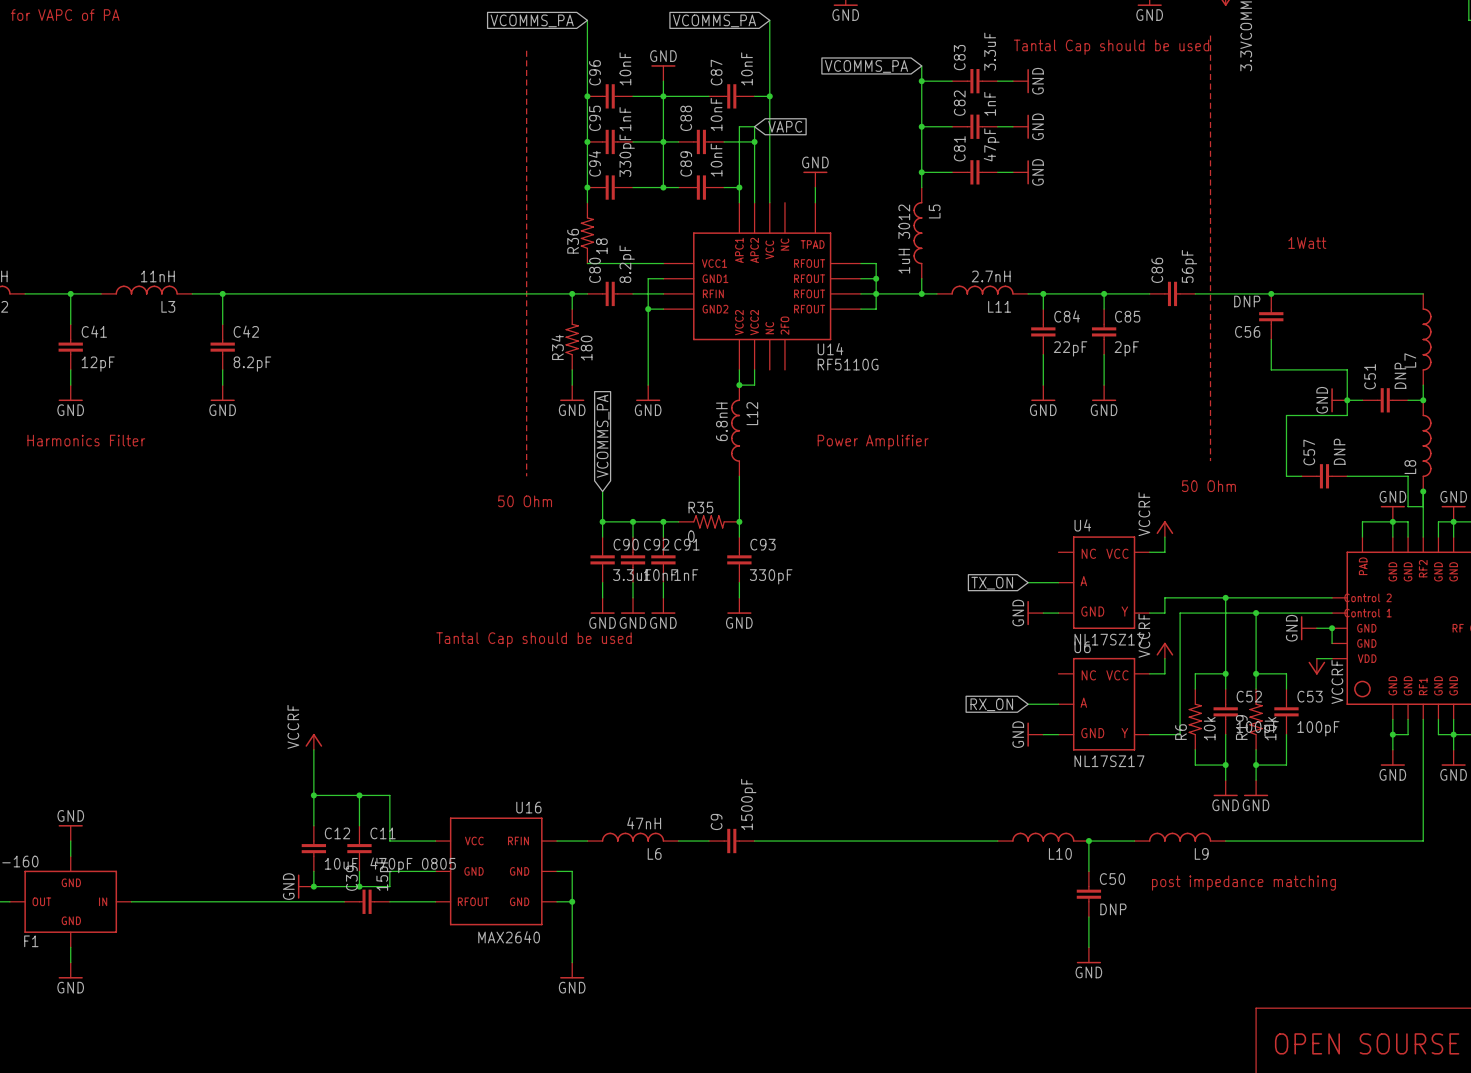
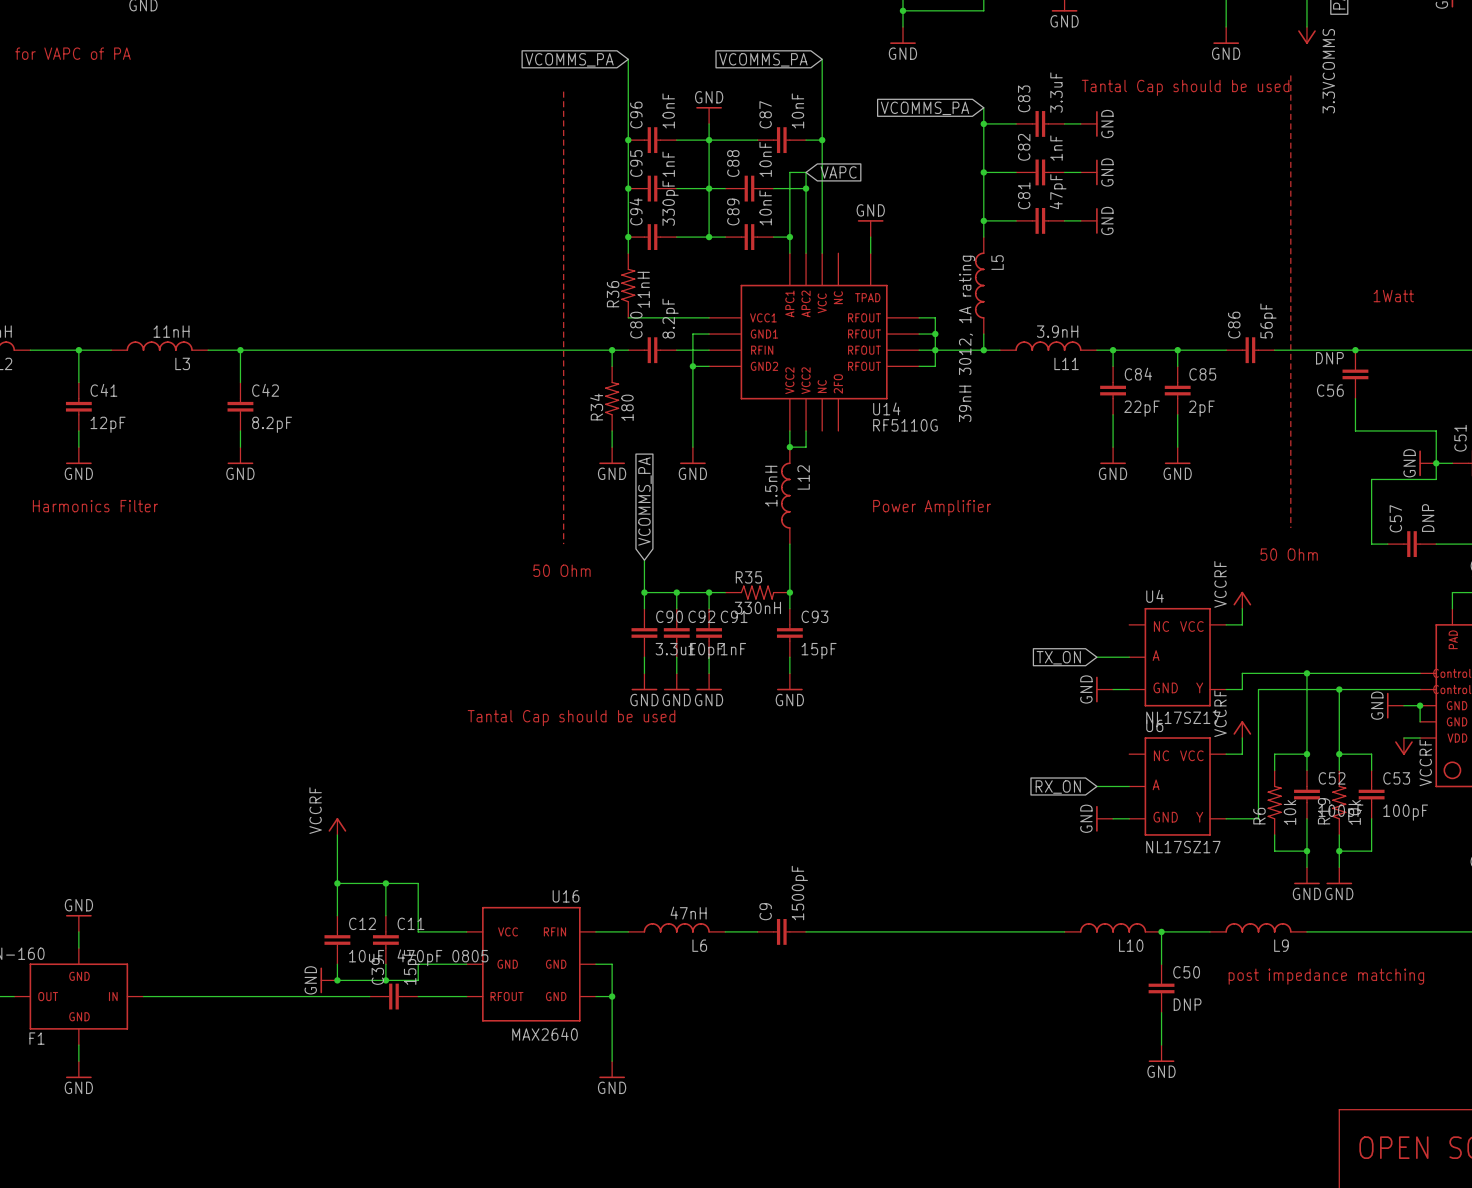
L5 value: 1uH 3012 (904, 239) -> 39nH 3012, 1A rating (967, 338)
R36 value: 18 (601, 246) -> 11nH (643, 289)
L11 value: 2.7nH (991, 276) -> 3.9nH (1057, 331)
L12 value: 6.8nH (721, 421) -> 1.5nH (771, 486)
R35 value: 0 (691, 536) -> 330nH (757, 607)
C92 value: 10nF (660, 575) -> 10pF (705, 651)
C93 value: 330pF (771, 576) -> 15pF (819, 651)

